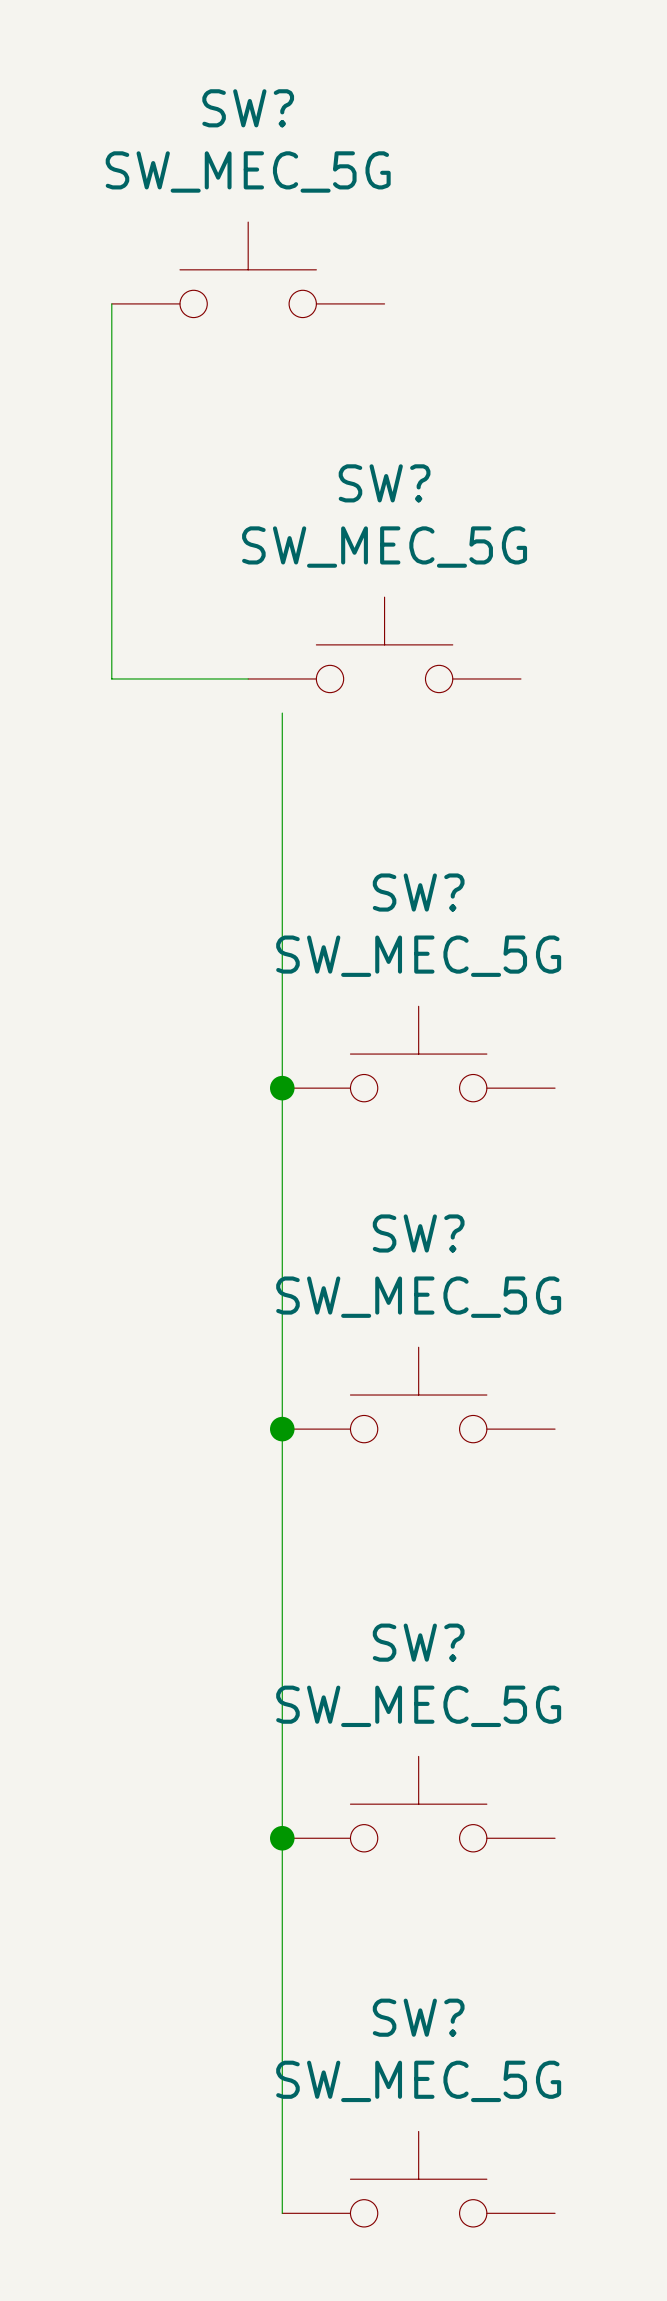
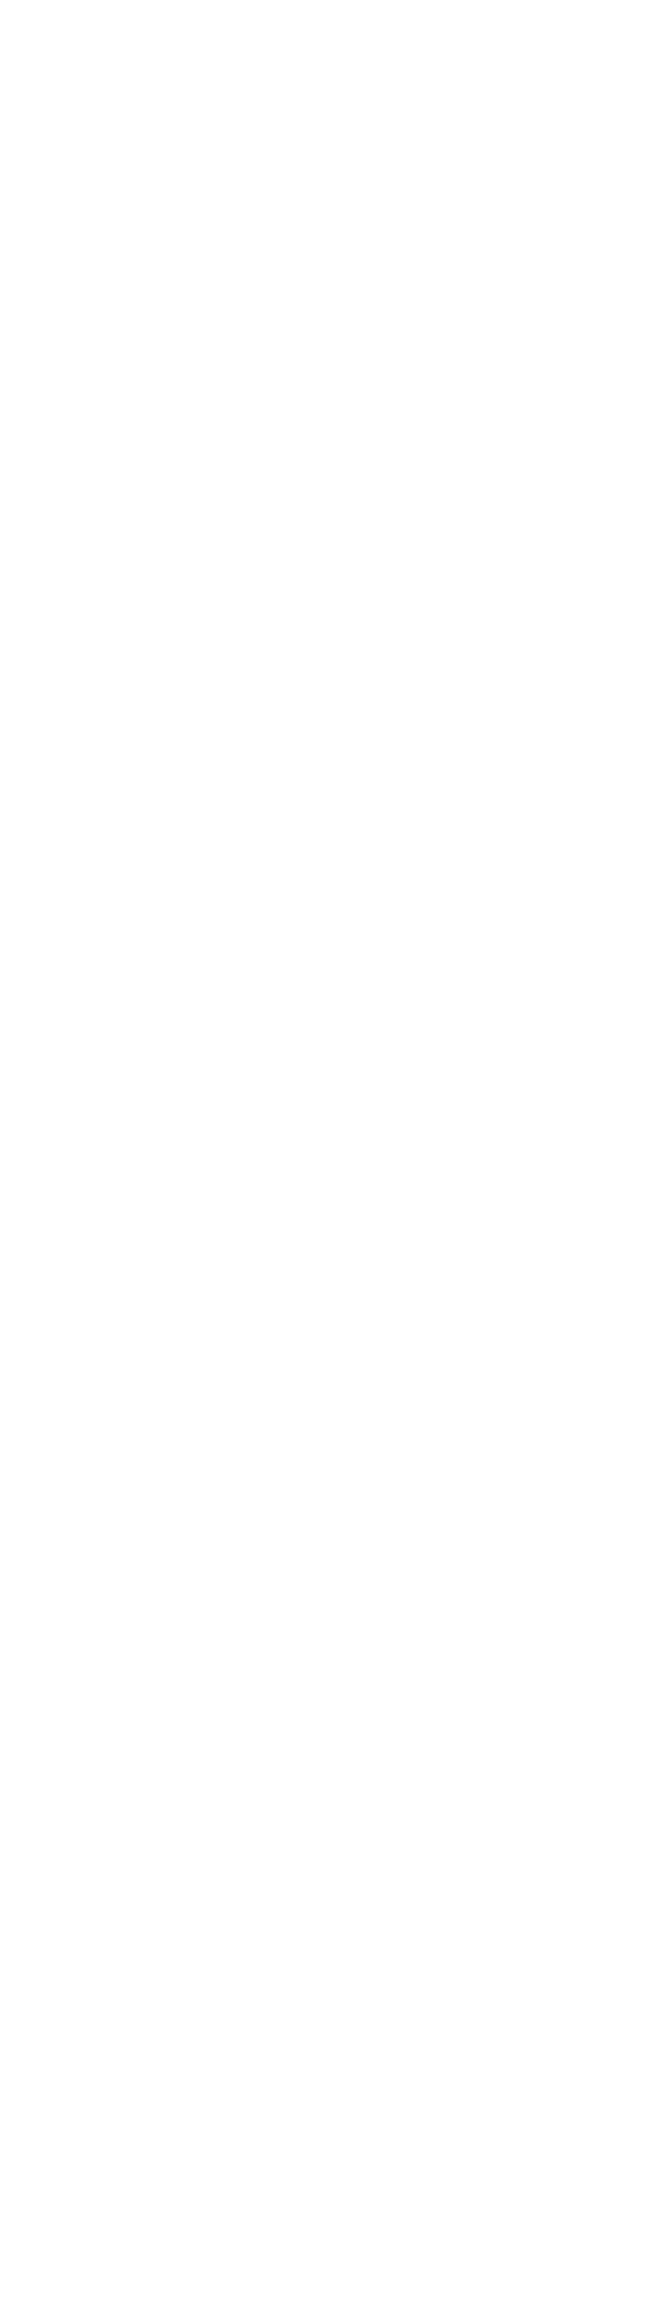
SW?: SW_MEC_5G (248, 269) -> none
wire: (111, 303) (111, 678) (248, 678) -> none
SW?: SW_MEC_5G (384, 644) -> none
wire: (282, 713) (282, 2213) -> none
SW?: SW_MEC_5G (418, 1054) -> none
junction: (282, 1088) -> none
SW?: SW_MEC_5G (418, 1395) -> none
junction: (282, 1429) -> none
SW?: SW_MEC_5G (418, 1804) -> none
junction: (282, 1838) -> none
SW?: SW_MEC_5G (418, 2179) -> none

